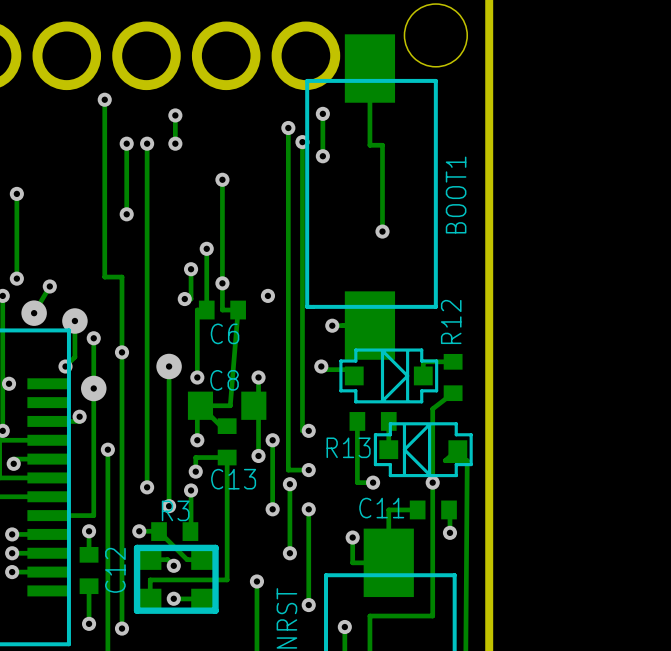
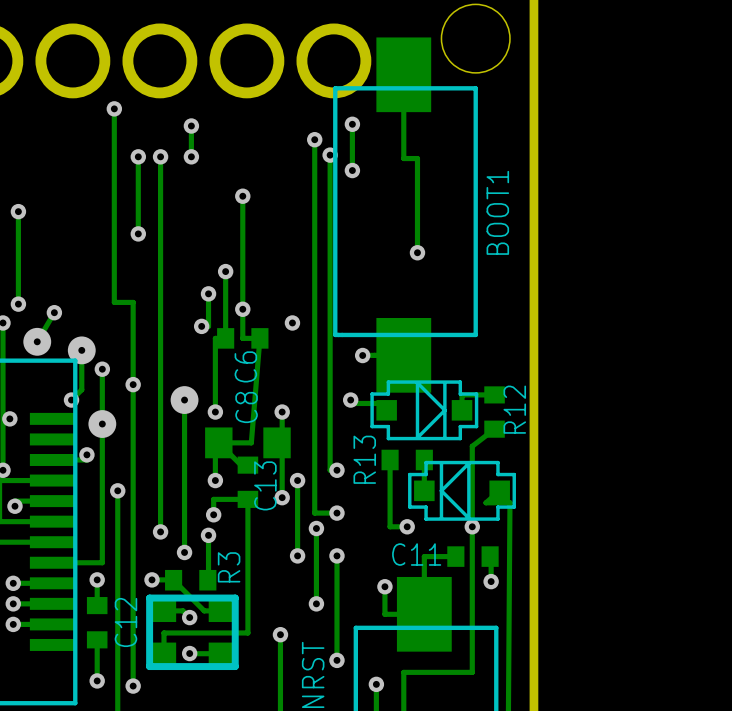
R12 name position: R12 (451, 321) -> R12 (514, 409)
C6 name rotation: 0° (225, 333) -> 90° counterclockwise (245, 366)
C8 name rotation: 0° (224, 380) -> 90° counterclockwise (246, 407)
R13 name rotation: 0° (348, 447) -> 90° counterclockwise (364, 459)
C13 name rotation: 0° (233, 479) -> 90° counterclockwise (265, 485)
R3 name rotation: 0° (175, 510) -> 90° counterclockwise (229, 567)

